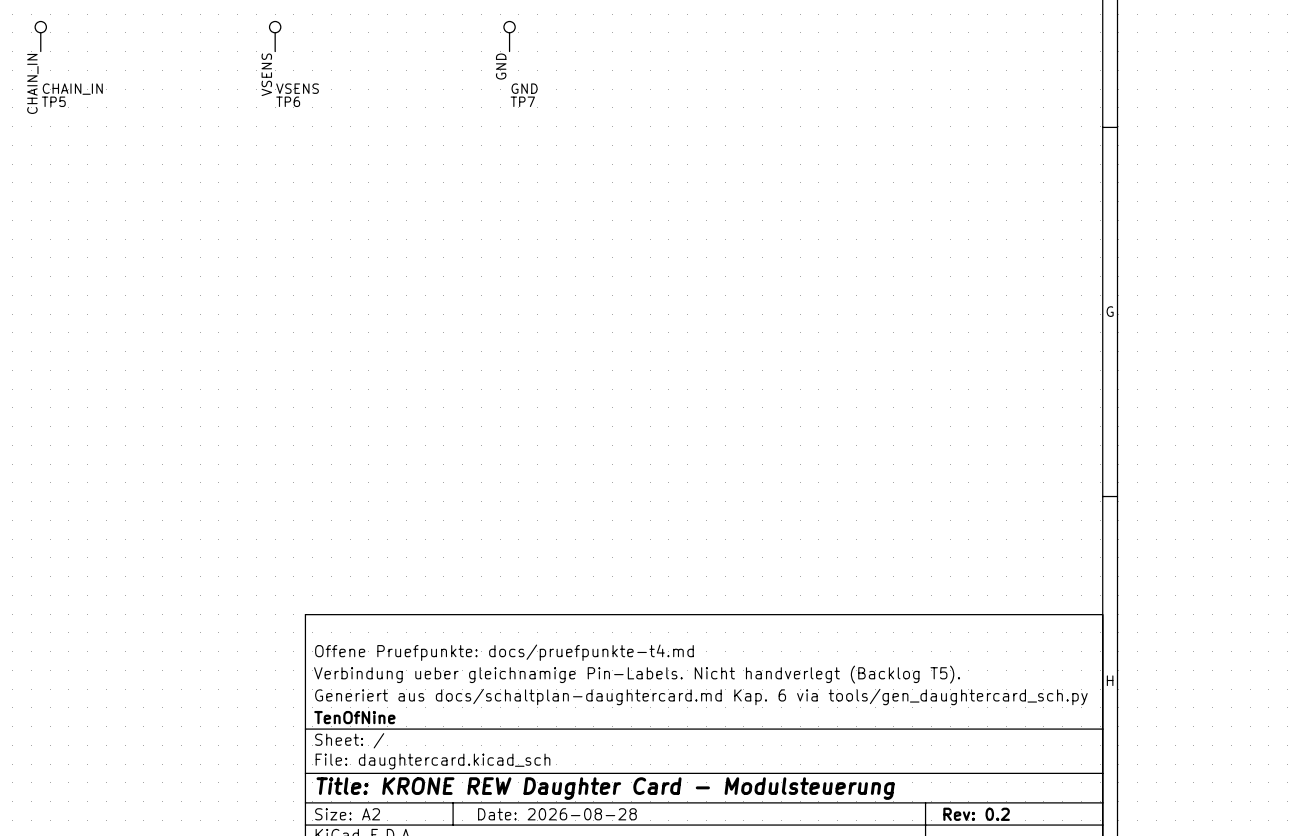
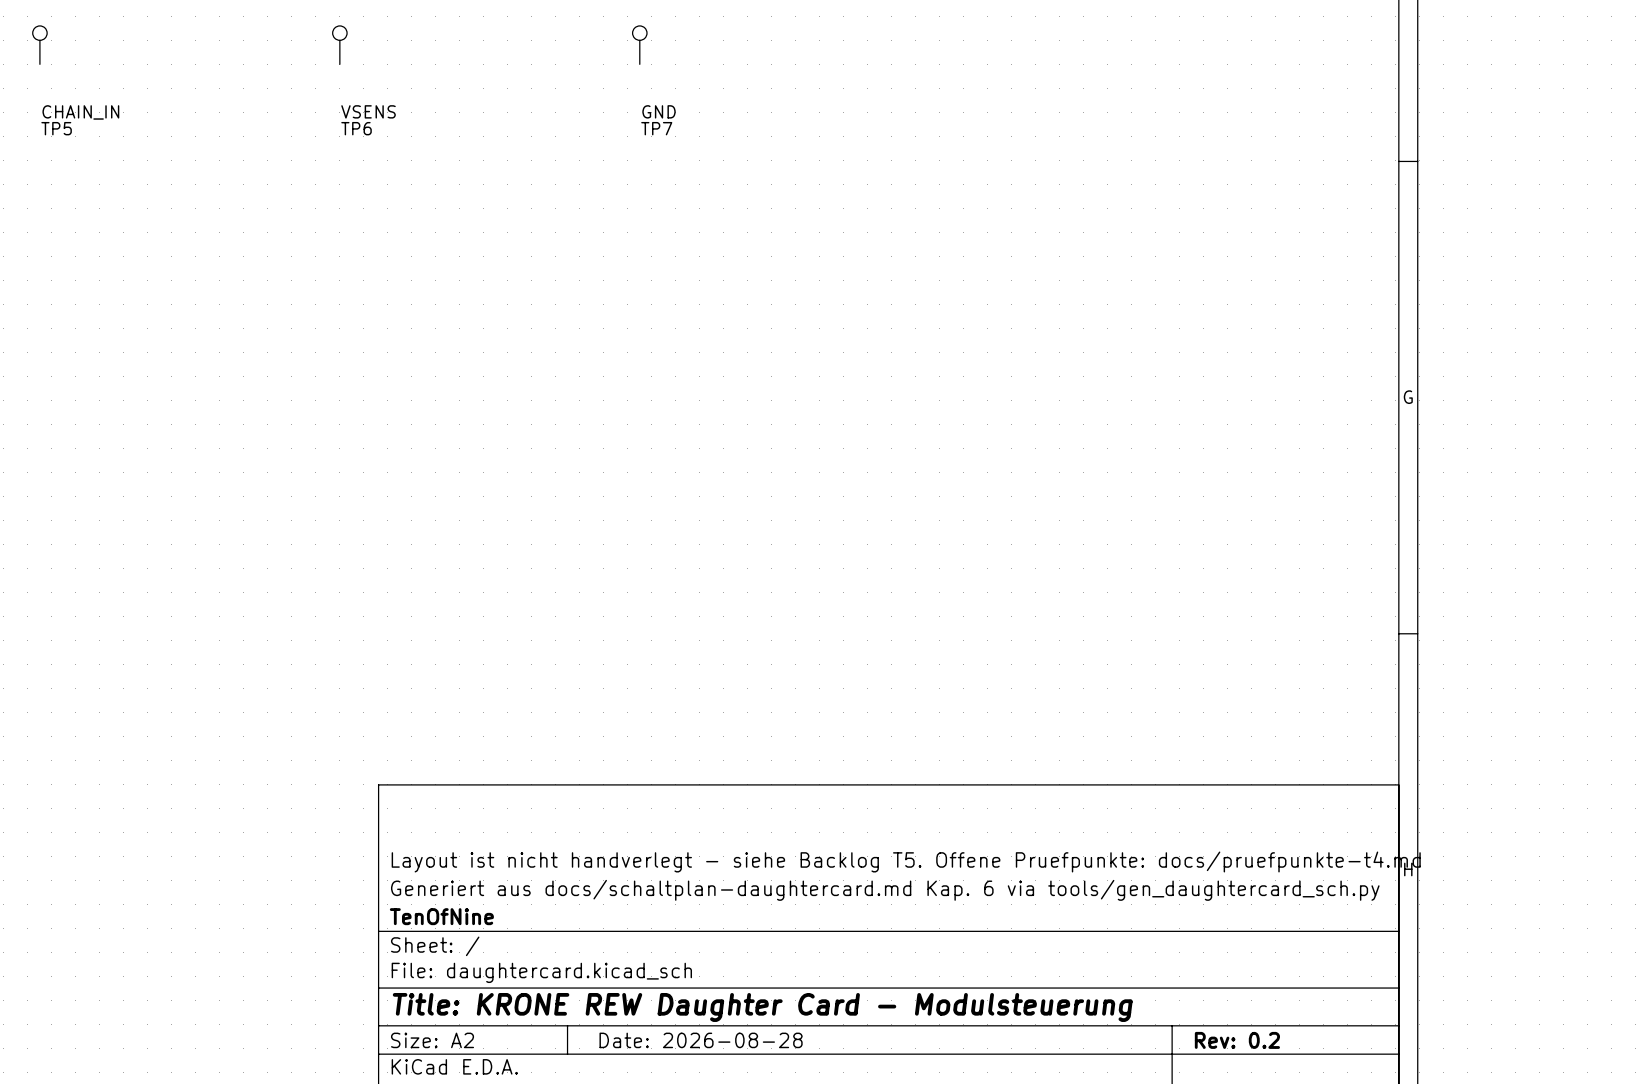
label: GND (501, 66) -> none
label: VSENS (266, 74) -> none
label: CHAIN_IN (32, 83) -> none
title block: Offene Pruefpunkte: docs/pruefpunkte-t4.md (504, 652) -> none
title block: Verbindung ueber gleichnamige Pin-Labels. Nicht handverlegt (Backlog T5). (637, 674) -> Layout ist nicht handverlegt - siehe Backlog T5. Offene Pruefpunkte: docs/pruefpunkte-t4.md (906, 861)

